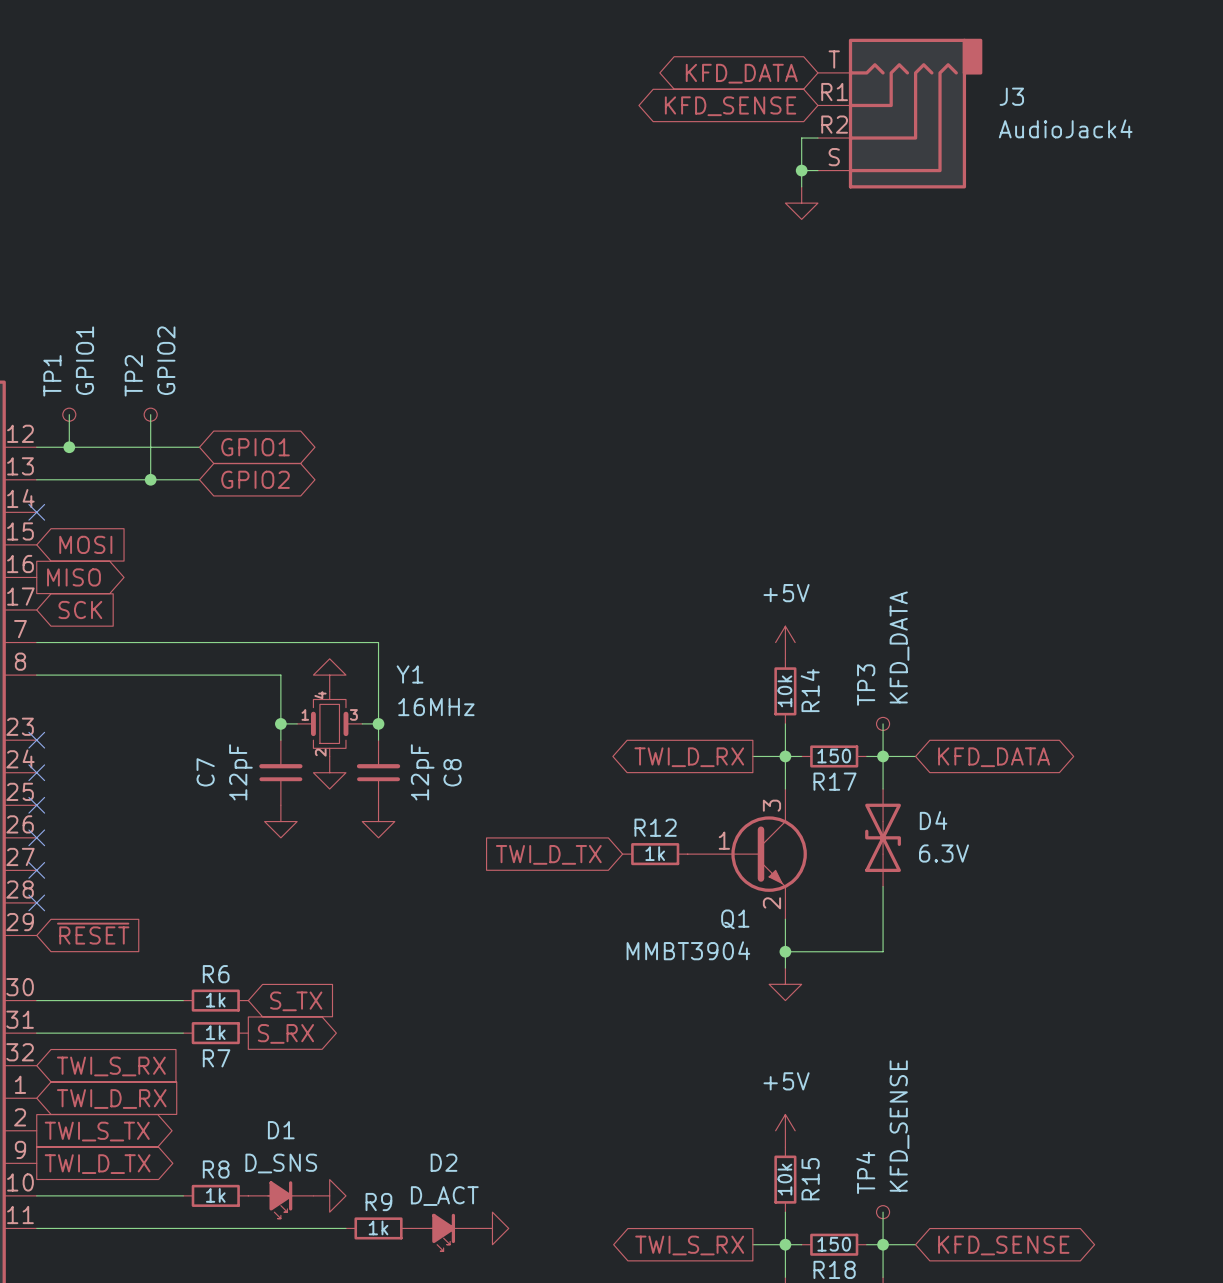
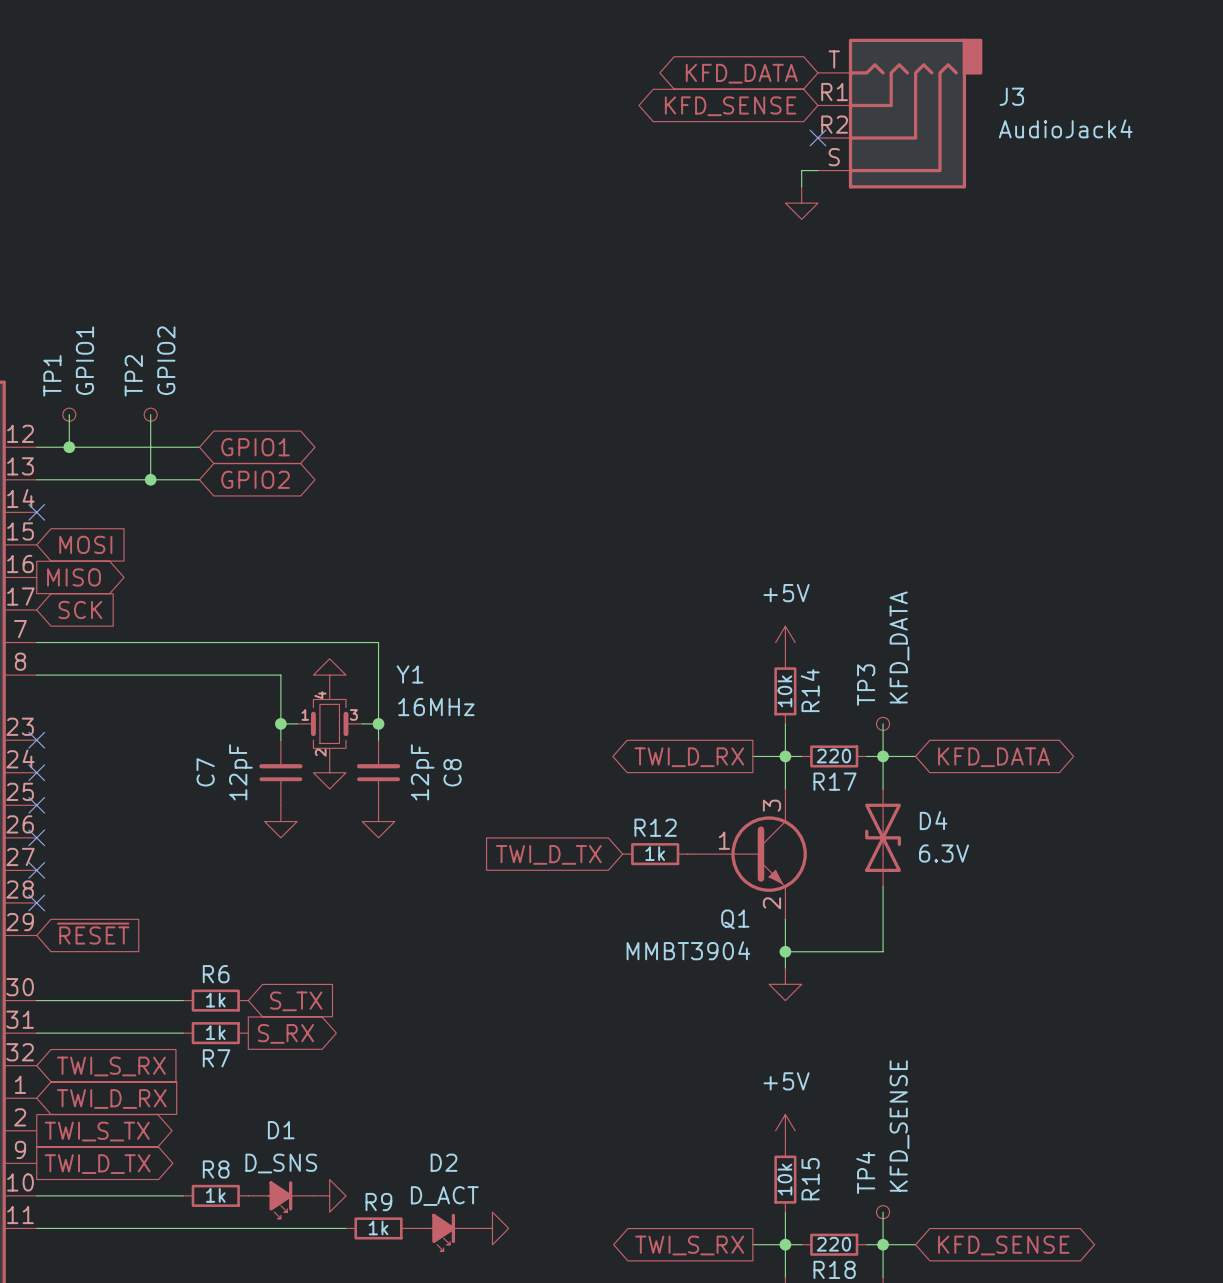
wire: (817, 138) (801, 138) (801, 170) -> none
no-connect mark: none -> (817, 138)
junction: (801, 170) -> none
R17 value: 150 (834, 755) -> 220 (833, 755)
R18 value: 150 (834, 1244) -> 220 (833, 1244)

